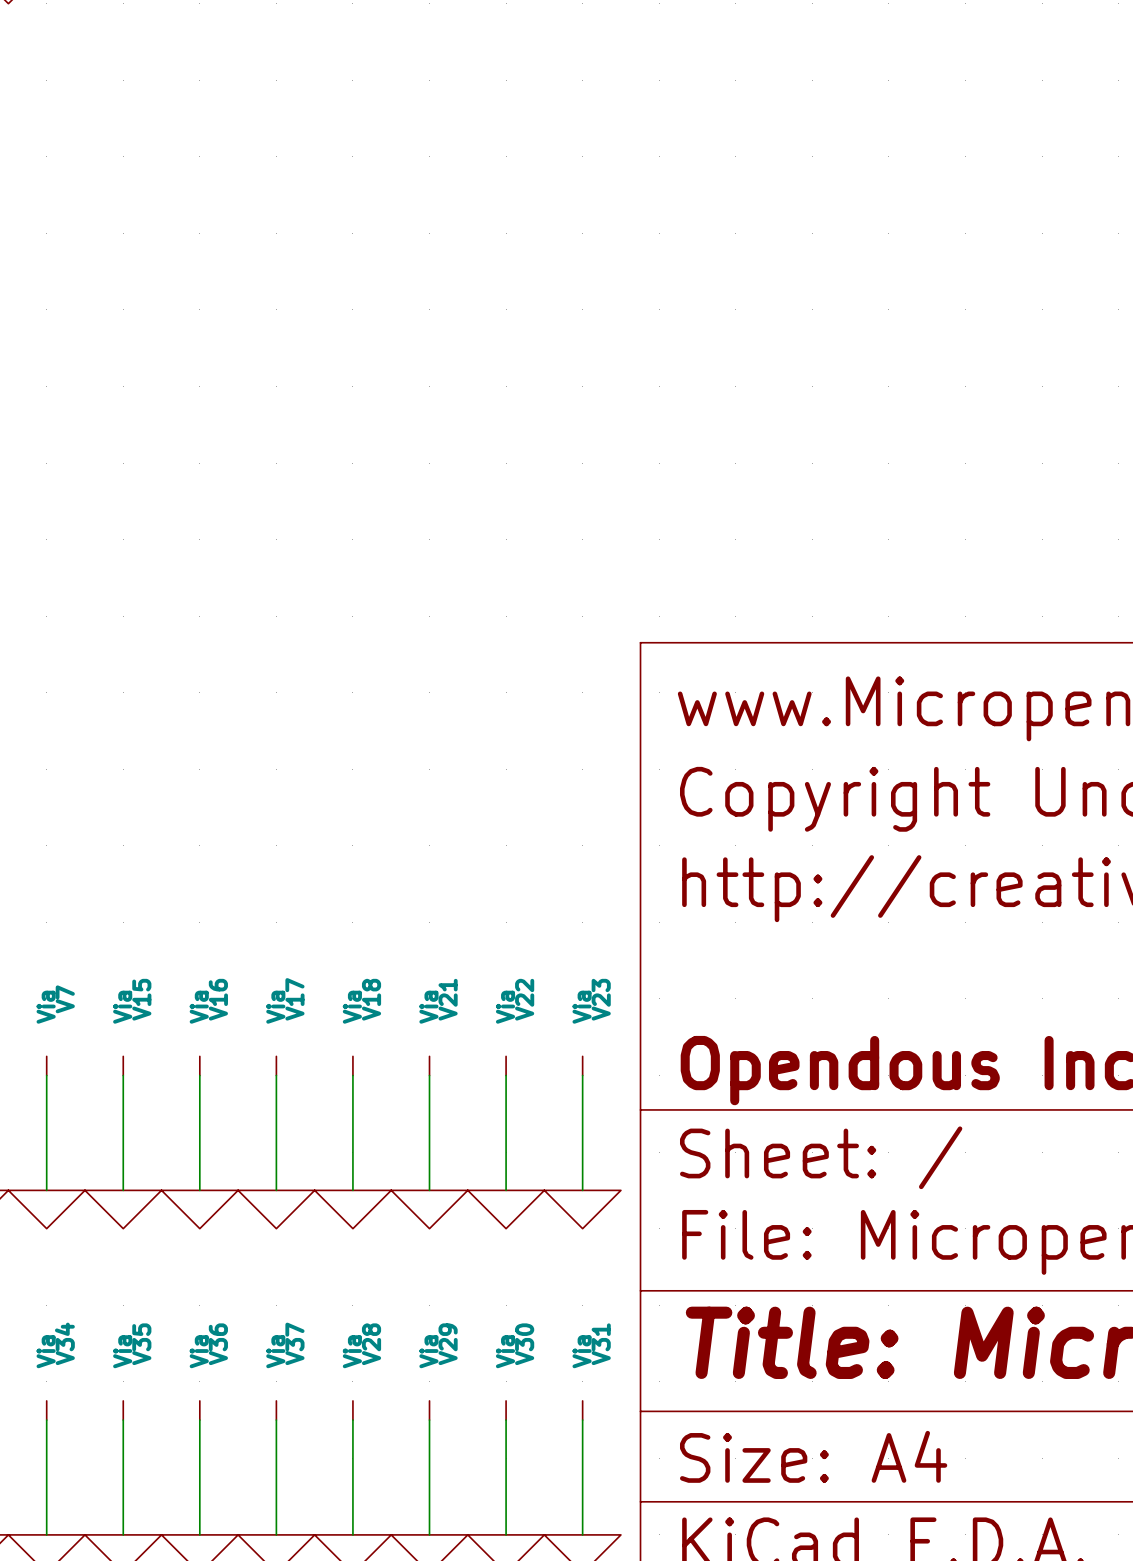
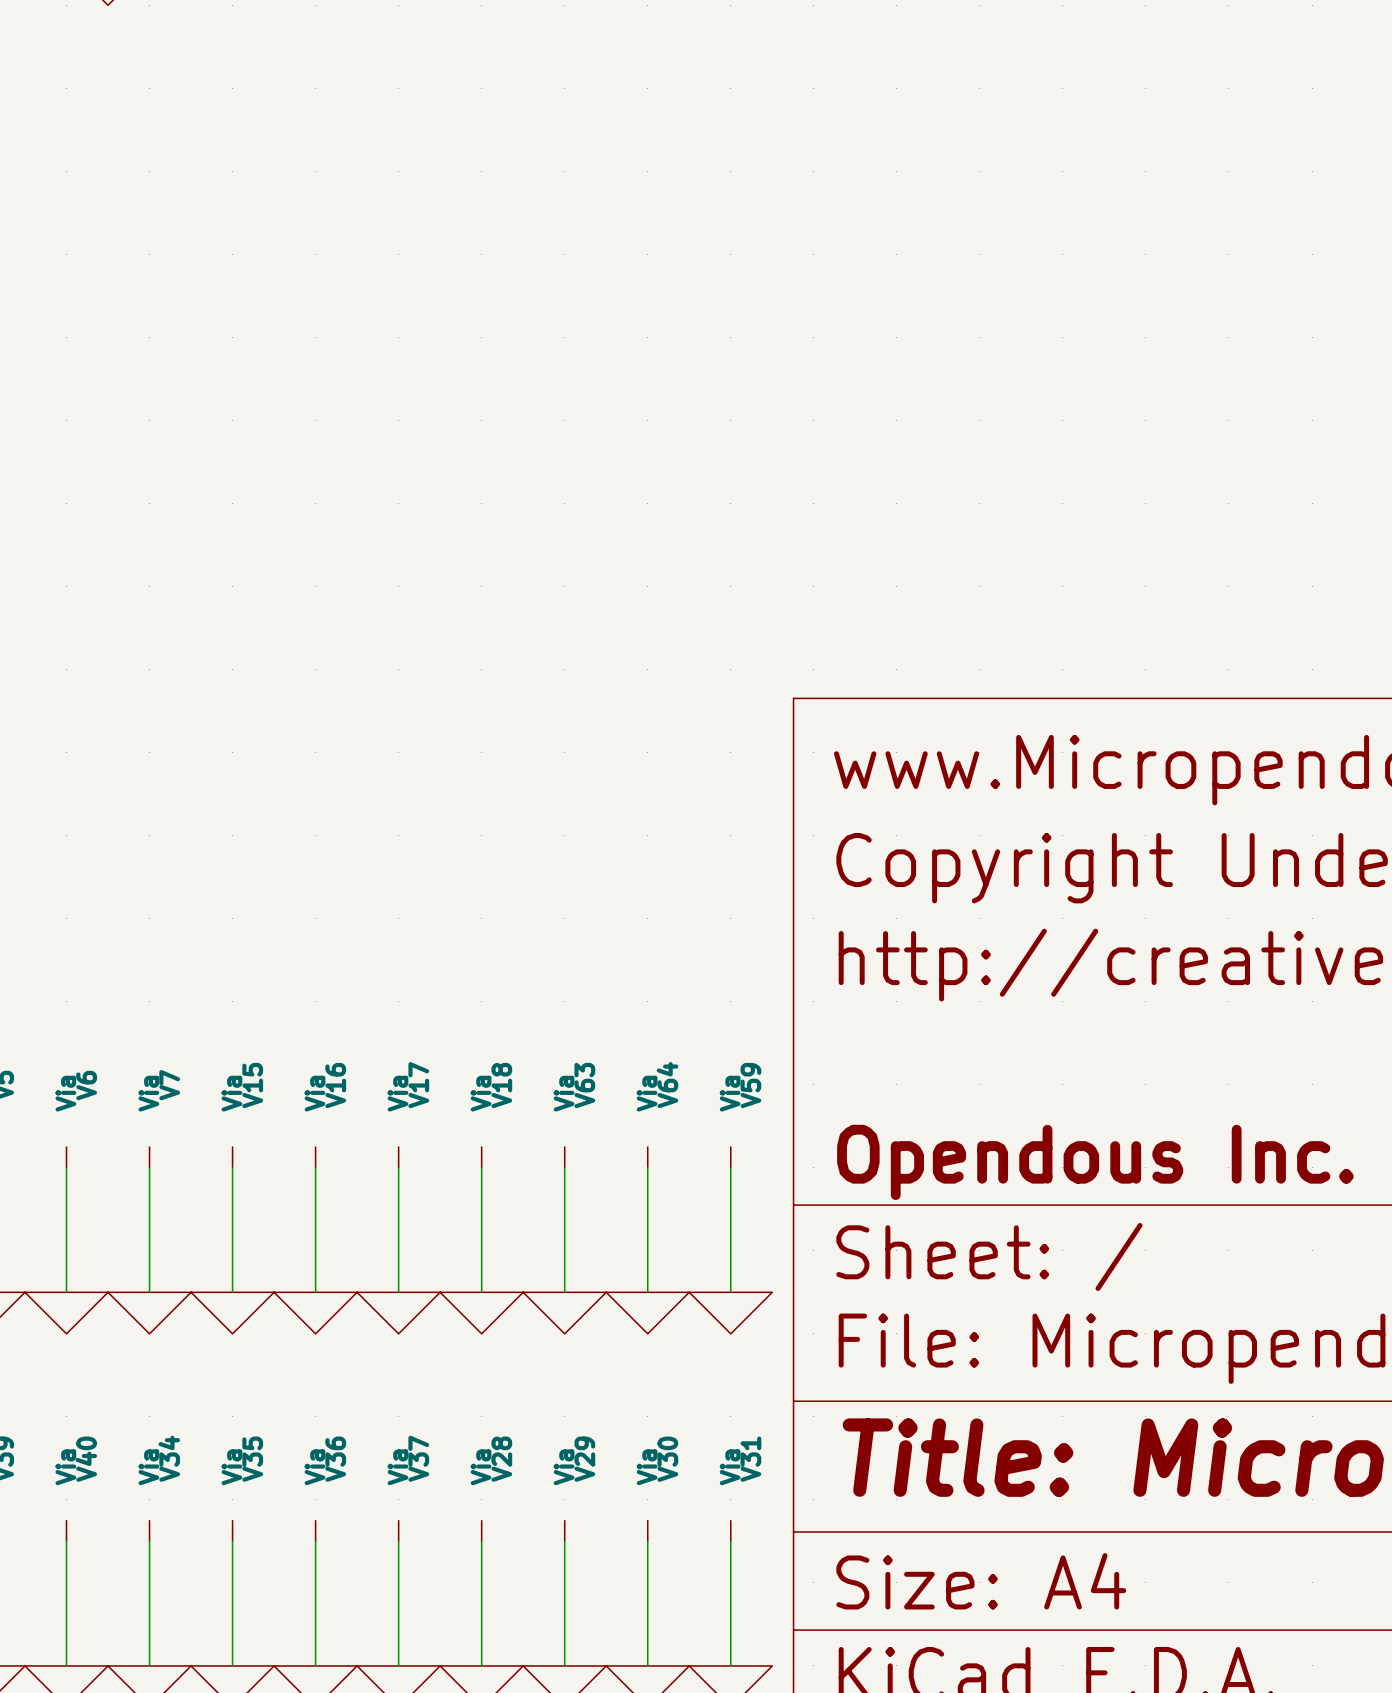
V21 name: V21 (448, 999) -> V63 (584, 1085)
V22 name: V22 (524, 999) -> V64 (667, 1085)
V23 name: V23 (601, 999) -> V59 (750, 1085)

